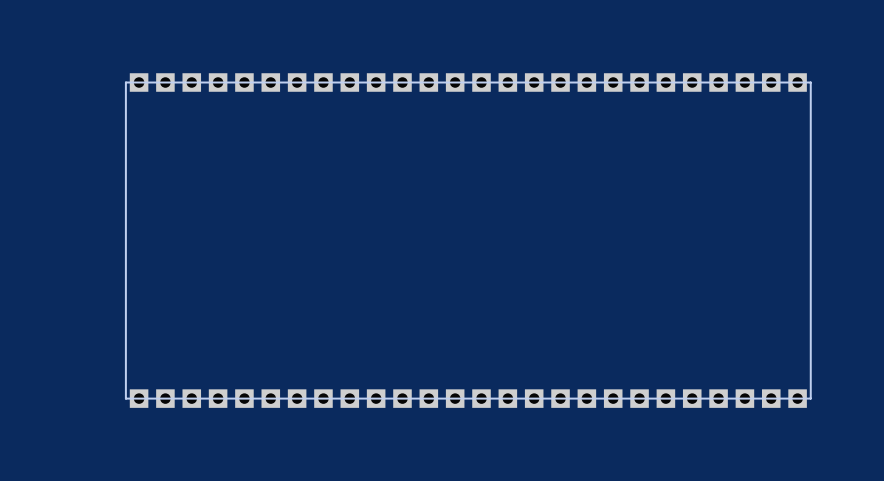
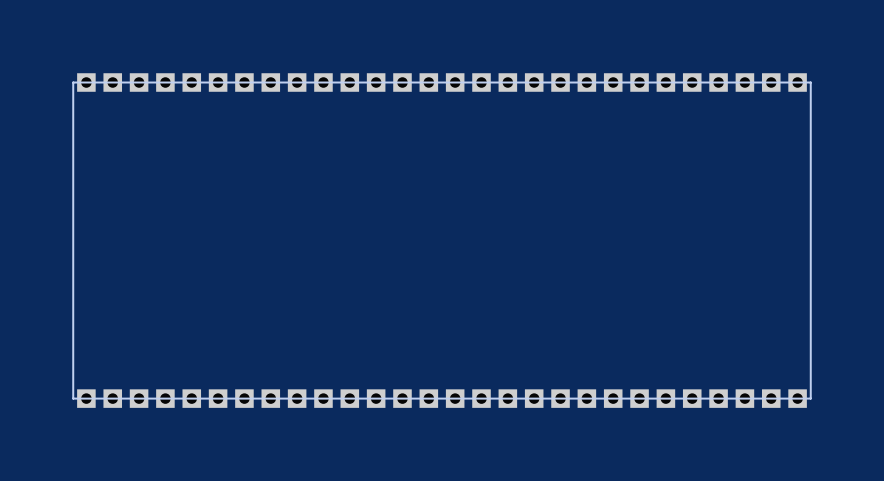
board edge: (125, 82) (125, 398) -> (125, 82) (73, 82) (73, 398) (125, 398)
part position: (231, 82) -> (178, 82)
part position: (231, 398) -> (178, 398)

